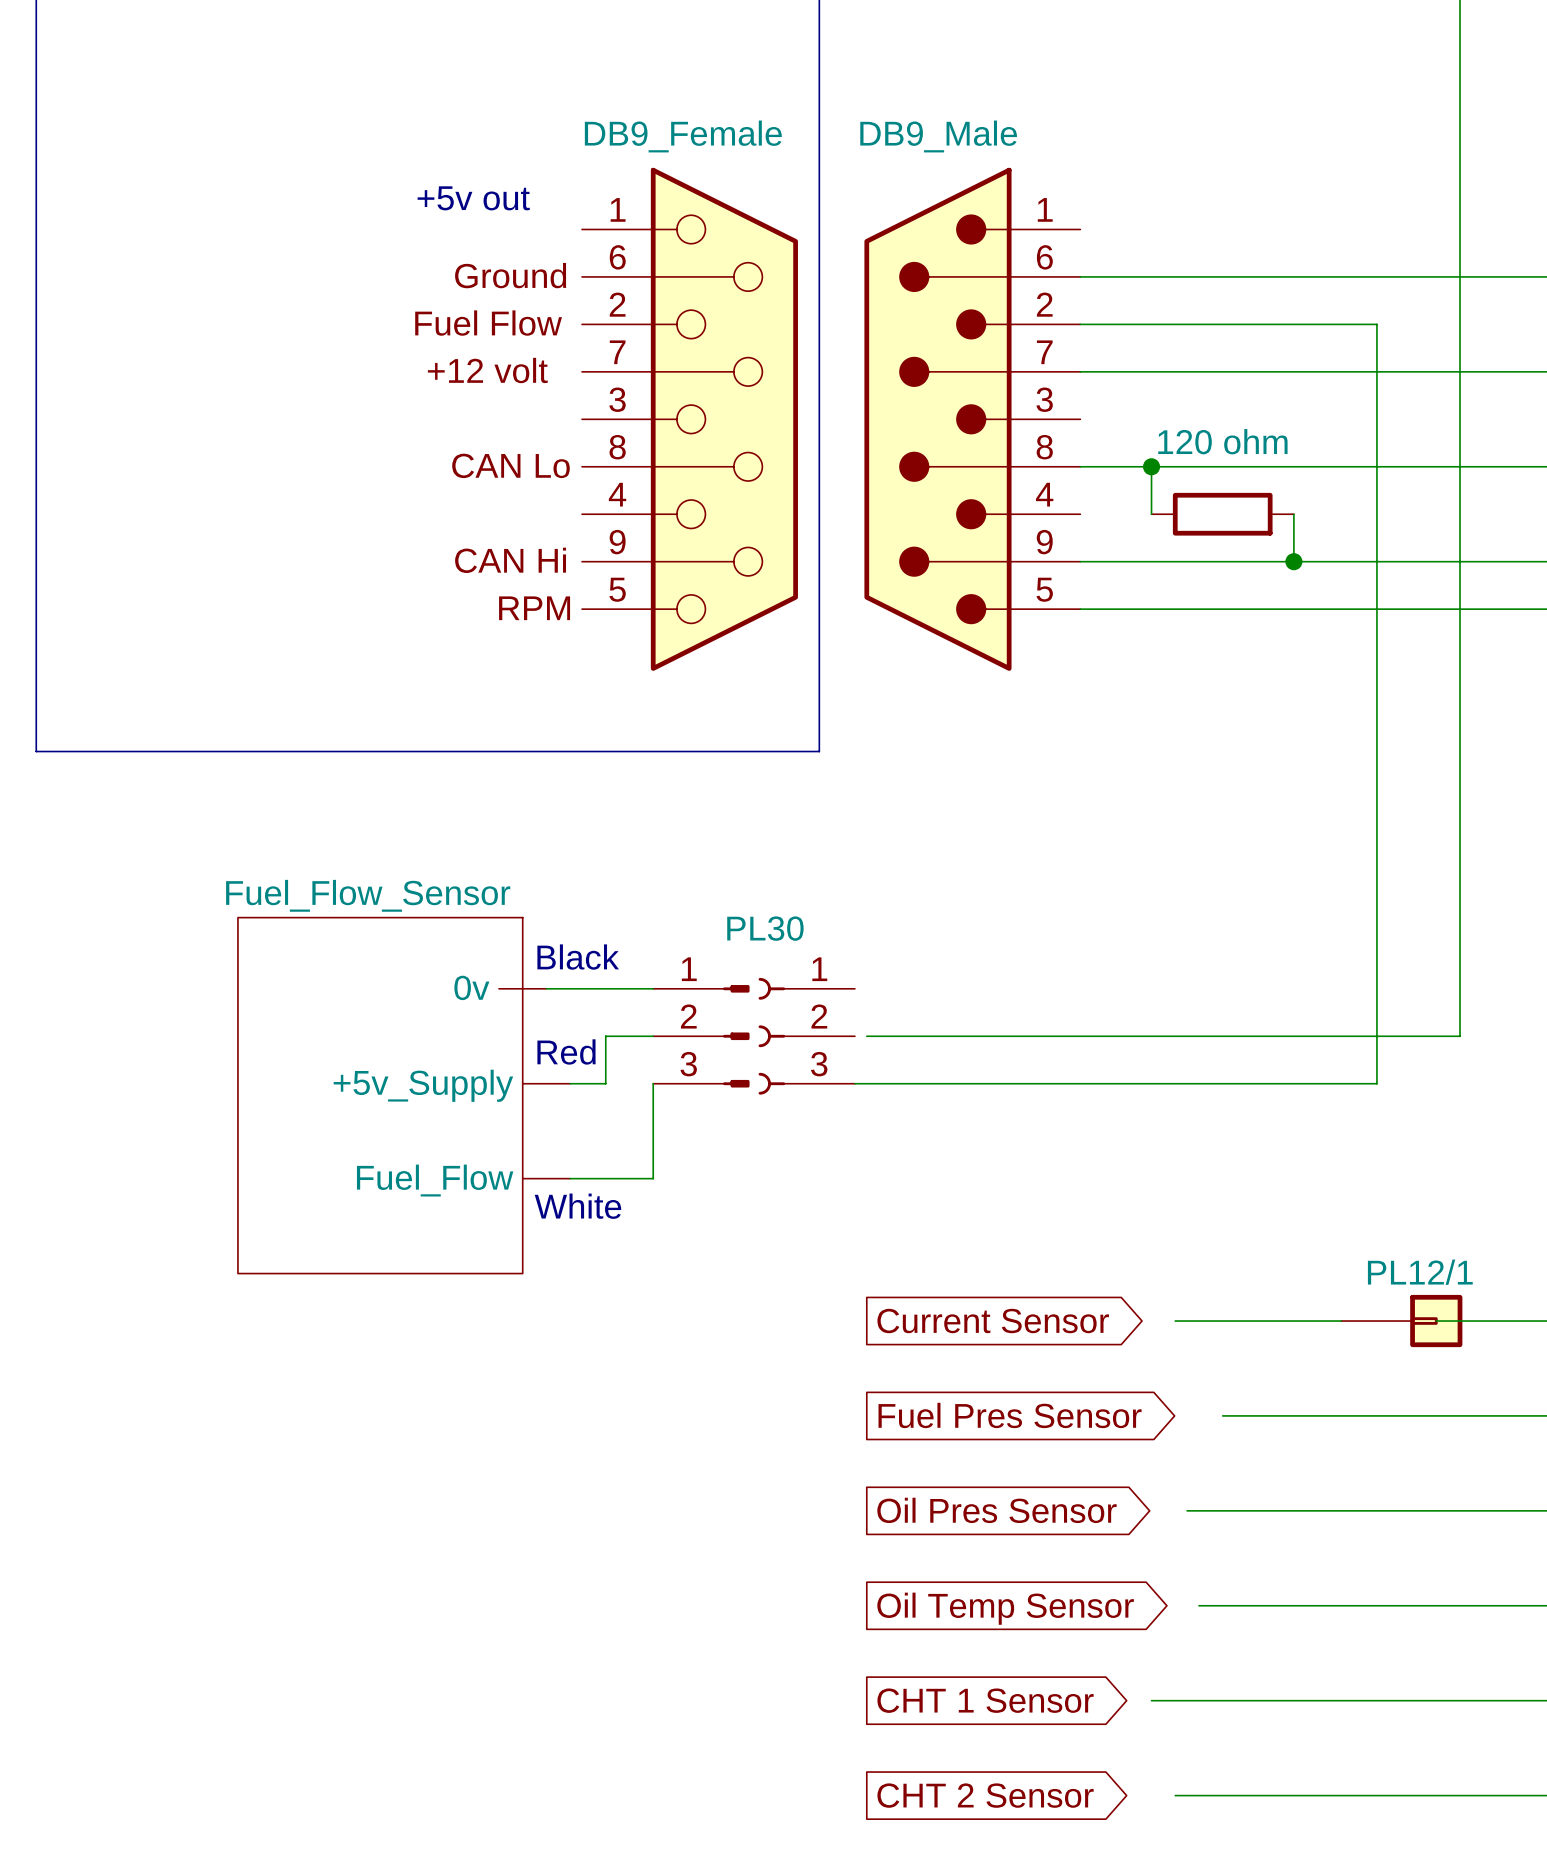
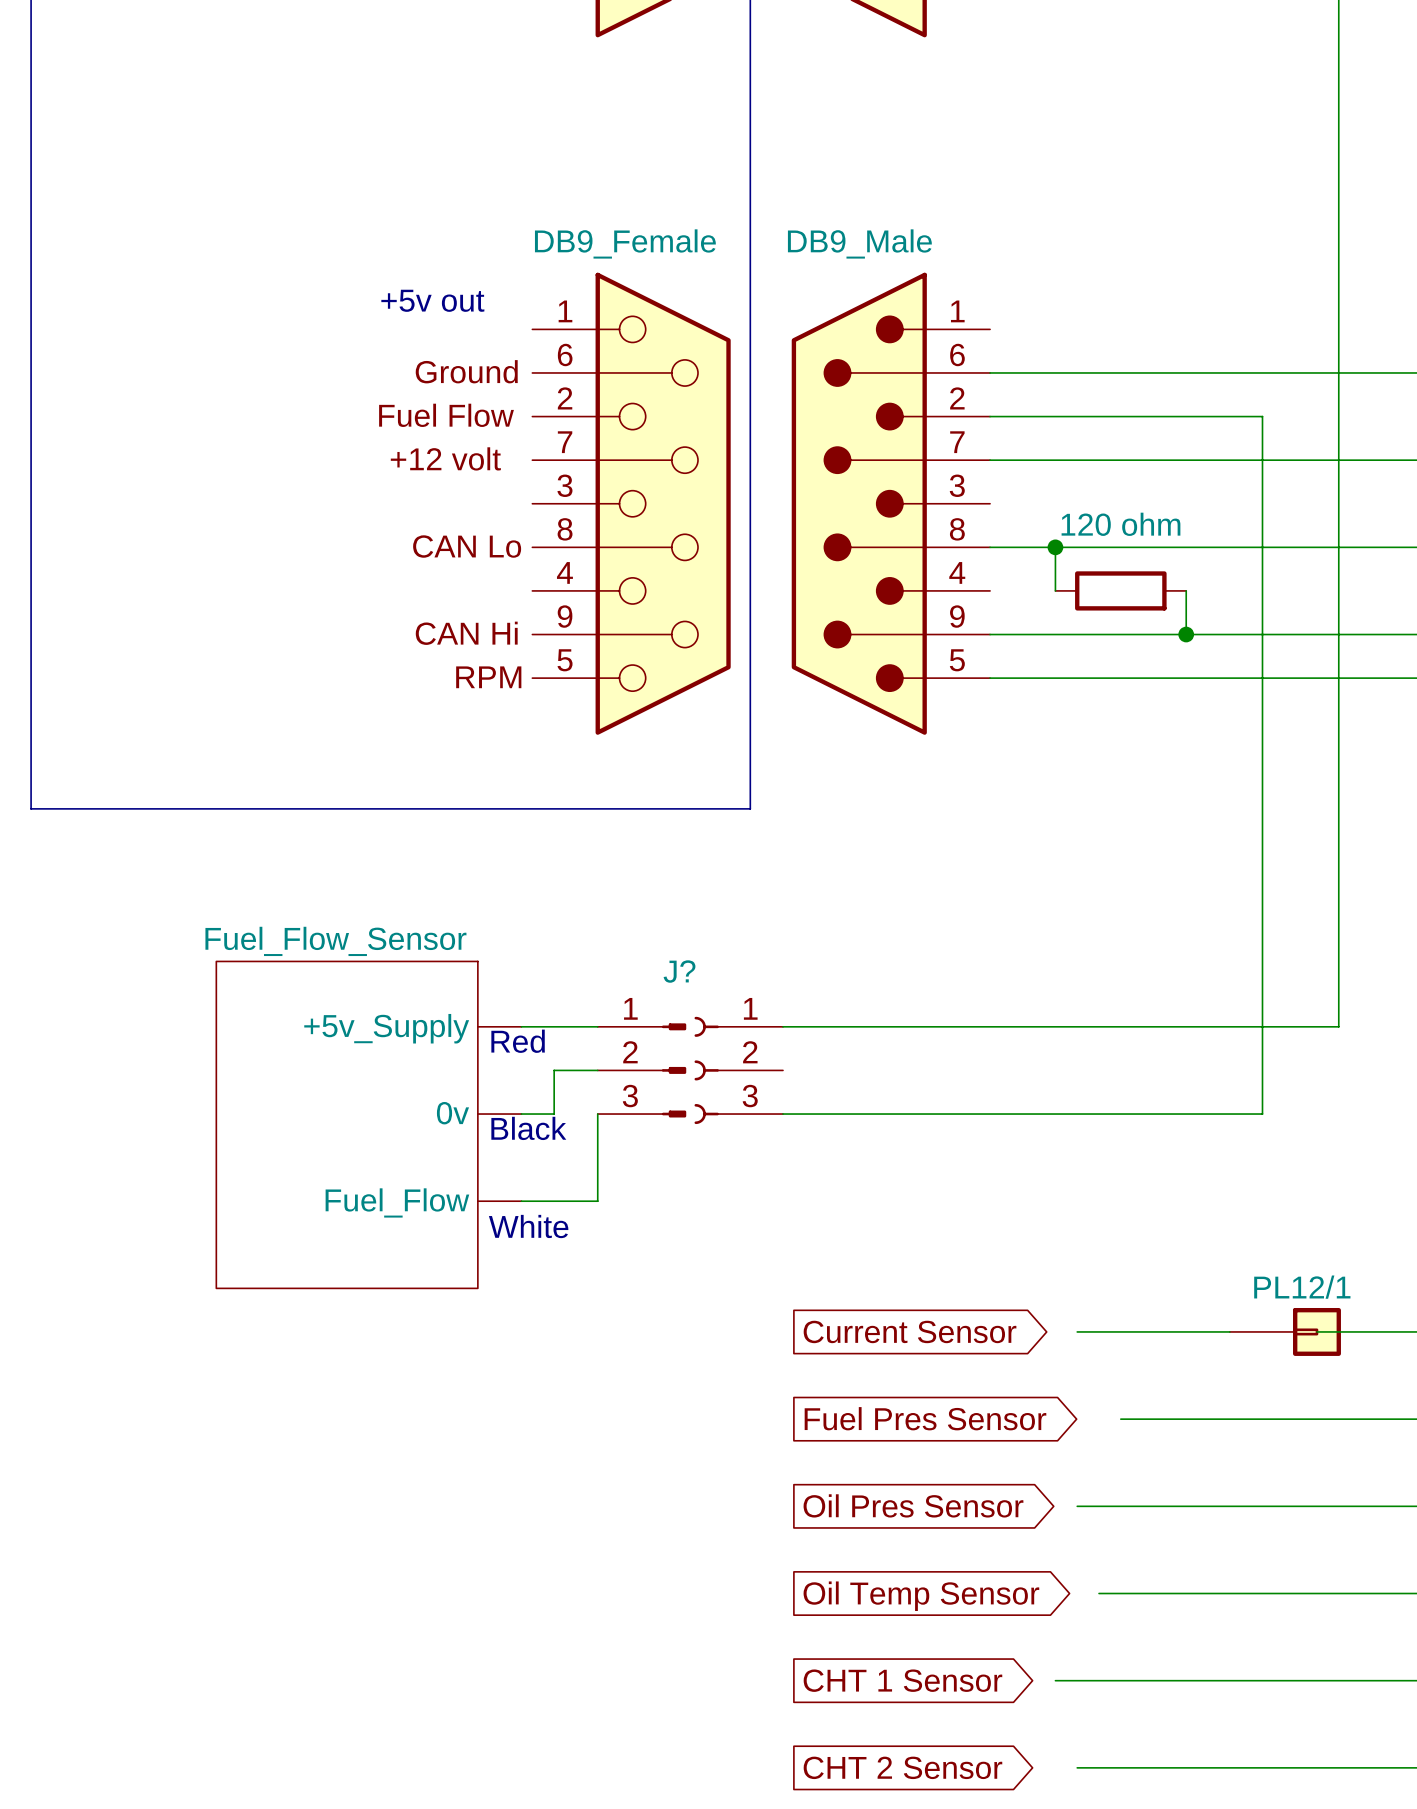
part symbol: [237, 917, 571, 1274] -> [216, 961, 522, 1289]
PL30 name: PL30 (765, 928) -> J? (679, 971)
text position: Black (578, 957) -> Black (528, 1128)
wire: (1460, 988) (1460, 1036) (866, 1036) -> (1338, 1026) (783, 1026)
text position: Red (566, 1051) -> Red (518, 1041)
wire: none -> (1077, 1506) (1088, 1506)

